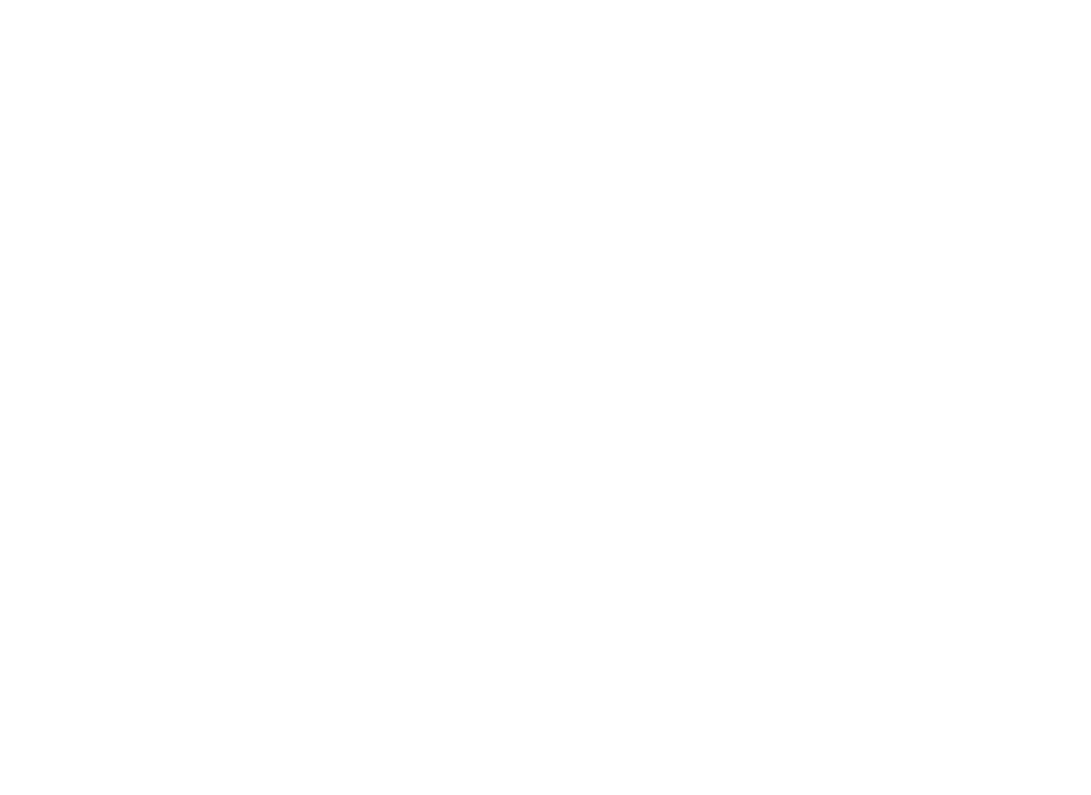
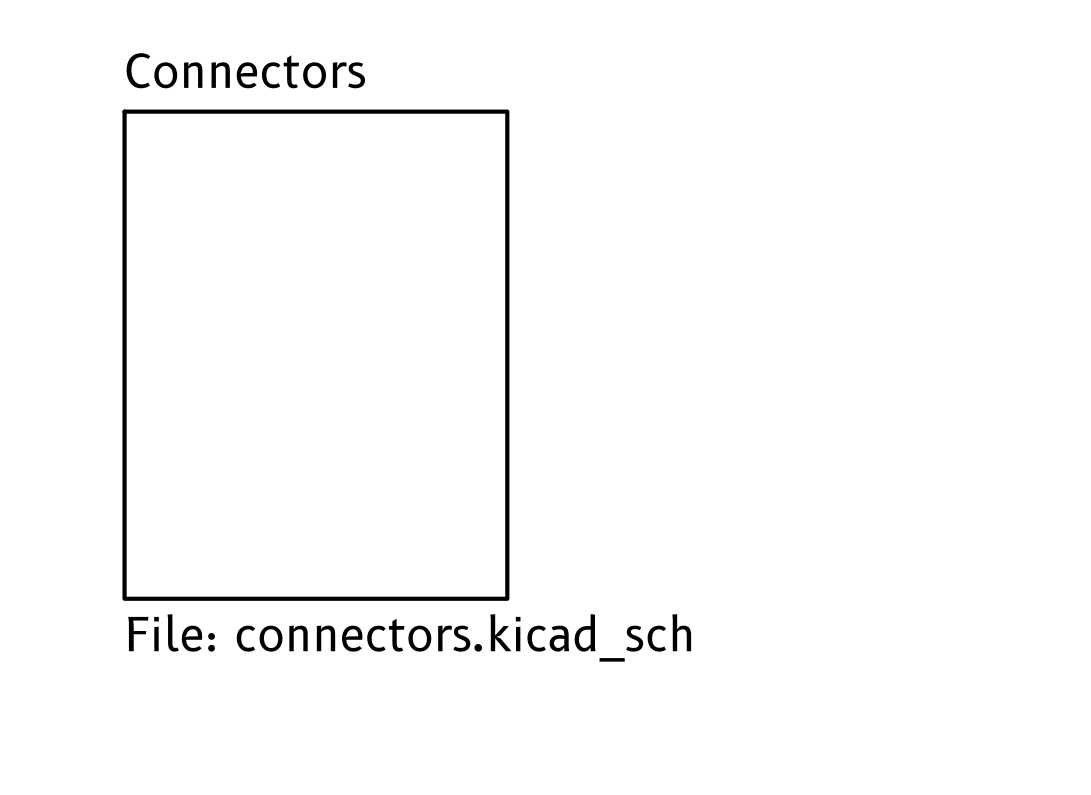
sheet Connectors: none -> File: connectors.kicad_sch (315, 355)

